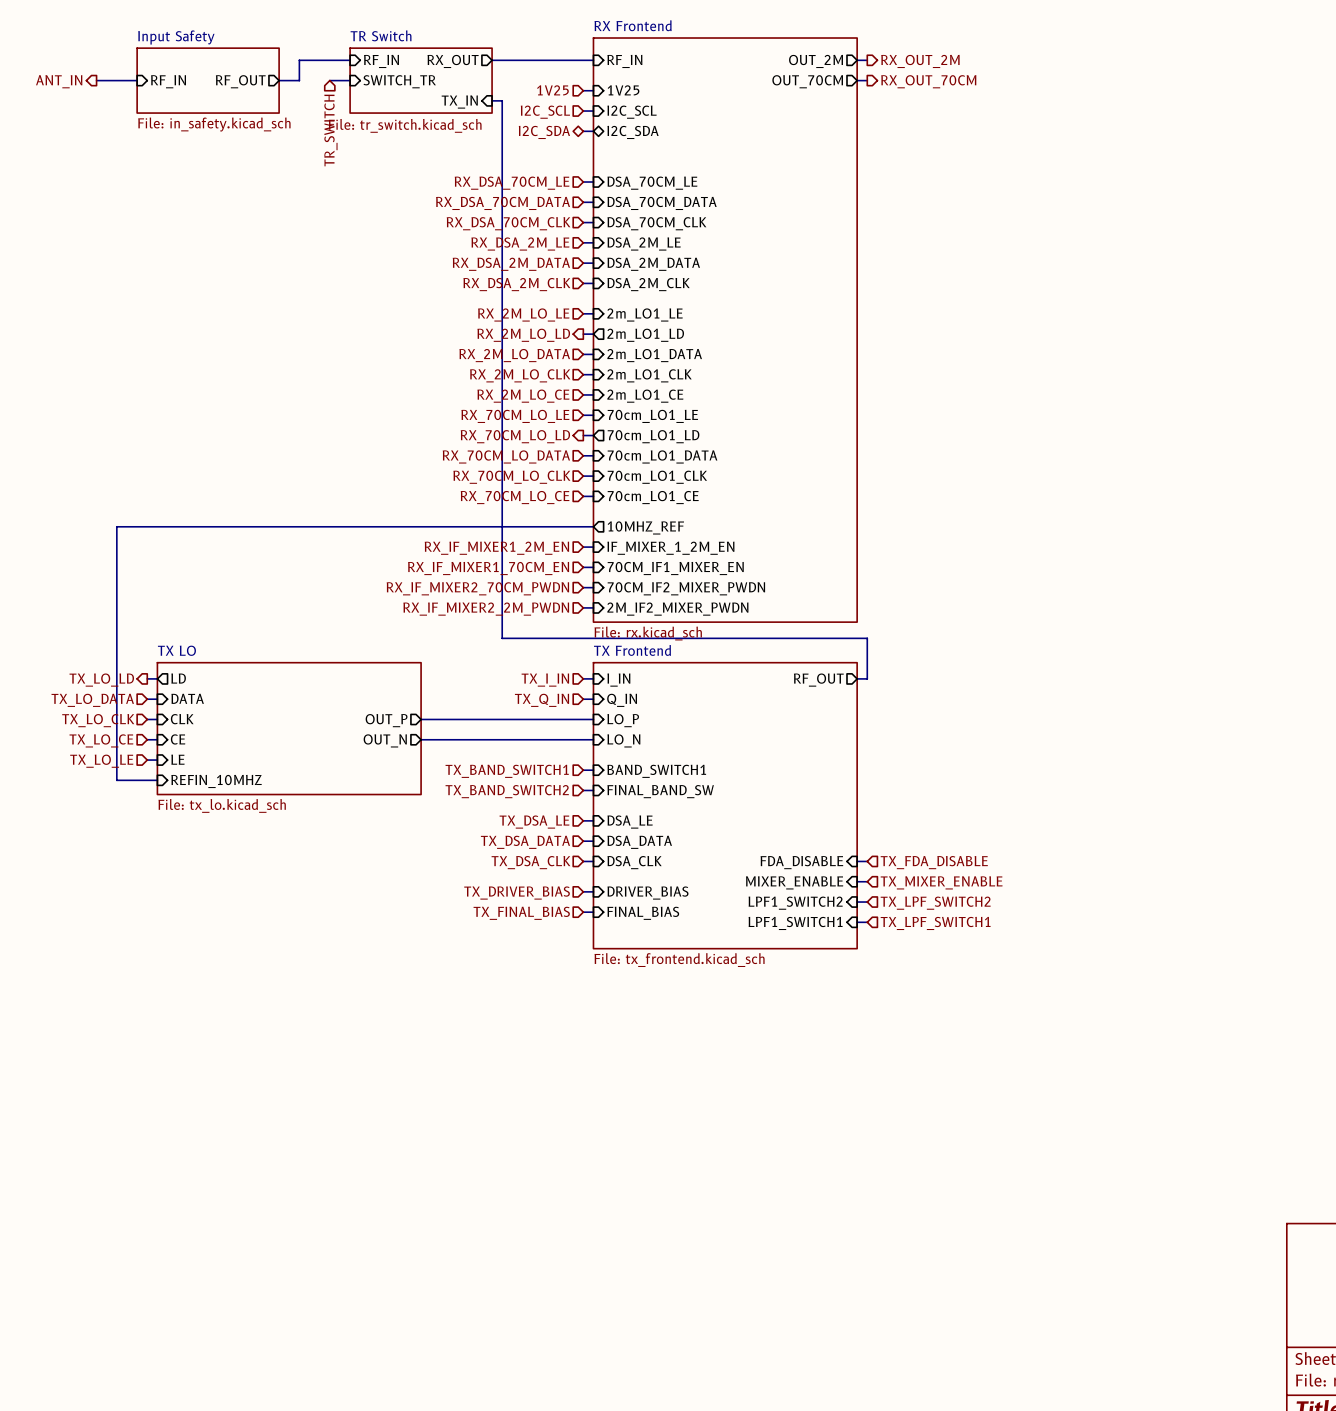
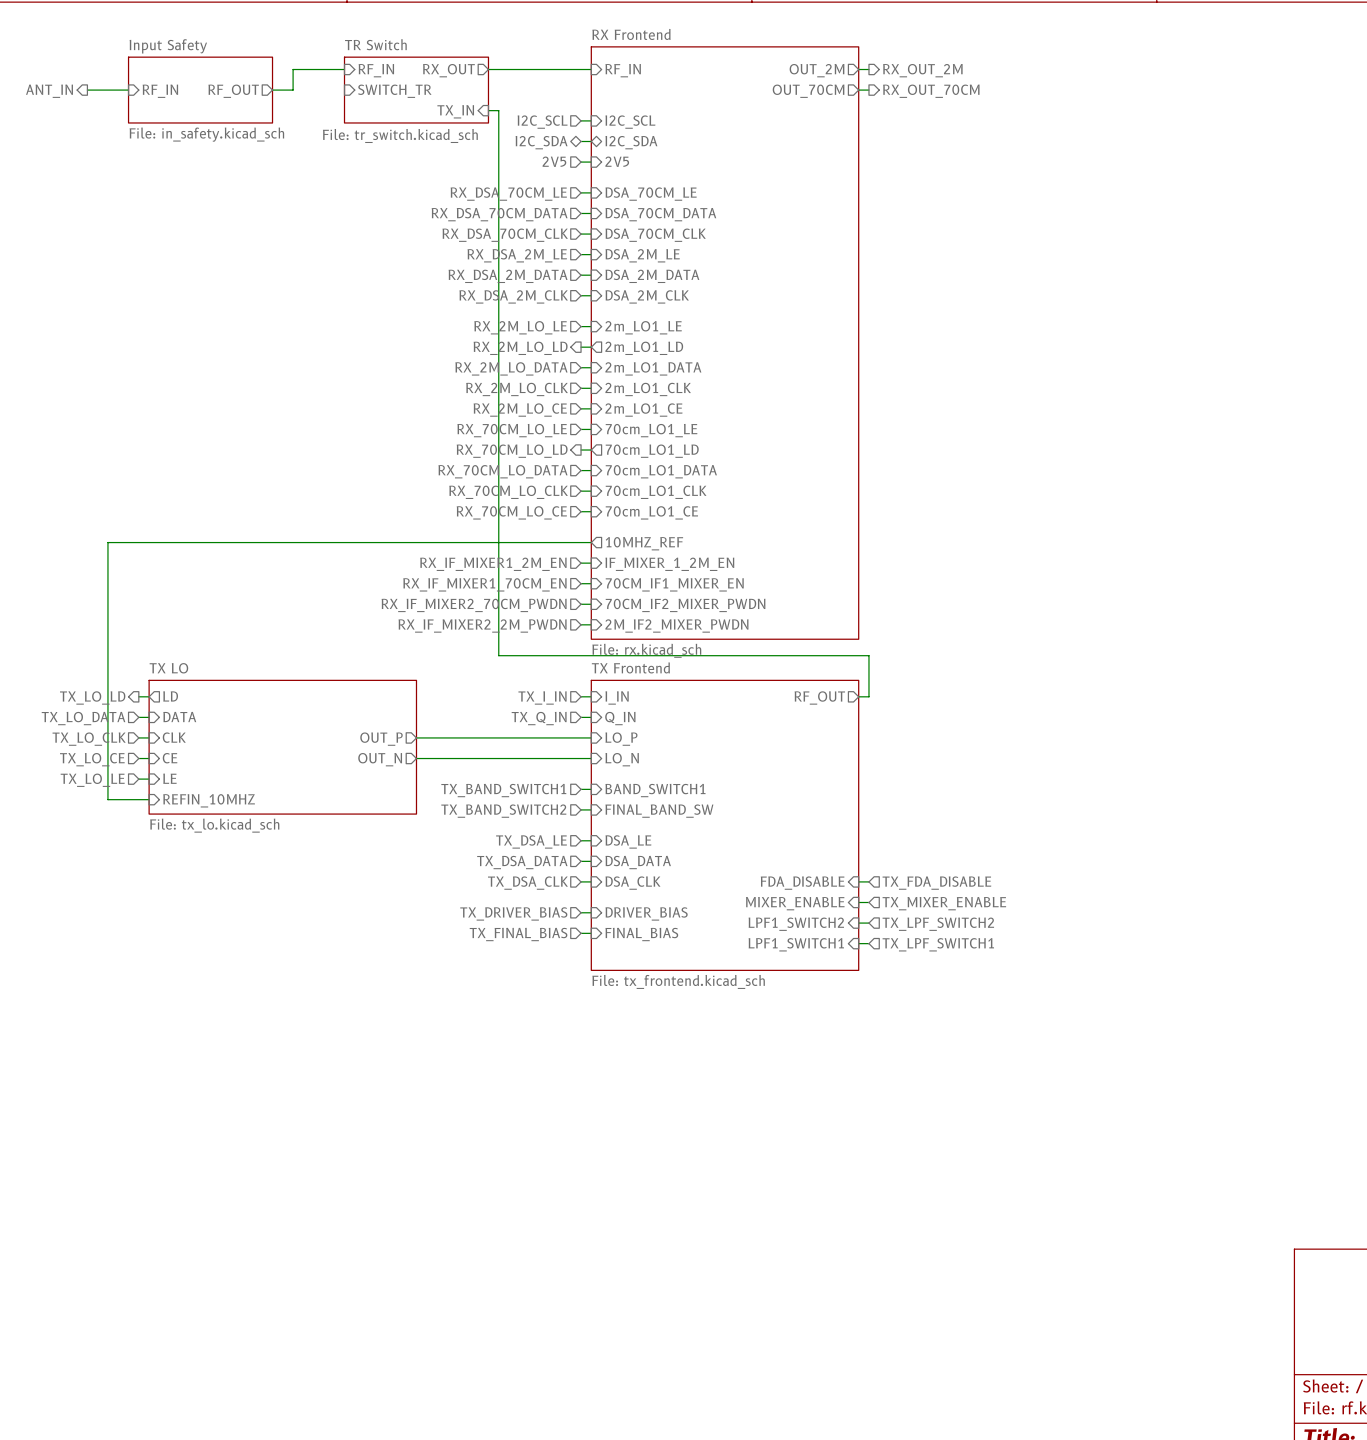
wire: (329, 80) (350, 80) -> none
hierarchical label: 1V25 (552, 90) -> none
wire: (583, 90) (593, 90) -> (581, 162) (591, 162)
sheet pin: 1V25 (623, 90) -> none
hierarchical label: TR_SWITCH (330, 130) -> none
hierarchical label: none -> 2V5 (554, 161)
sheet pin: none -> 2V5 (617, 161)

